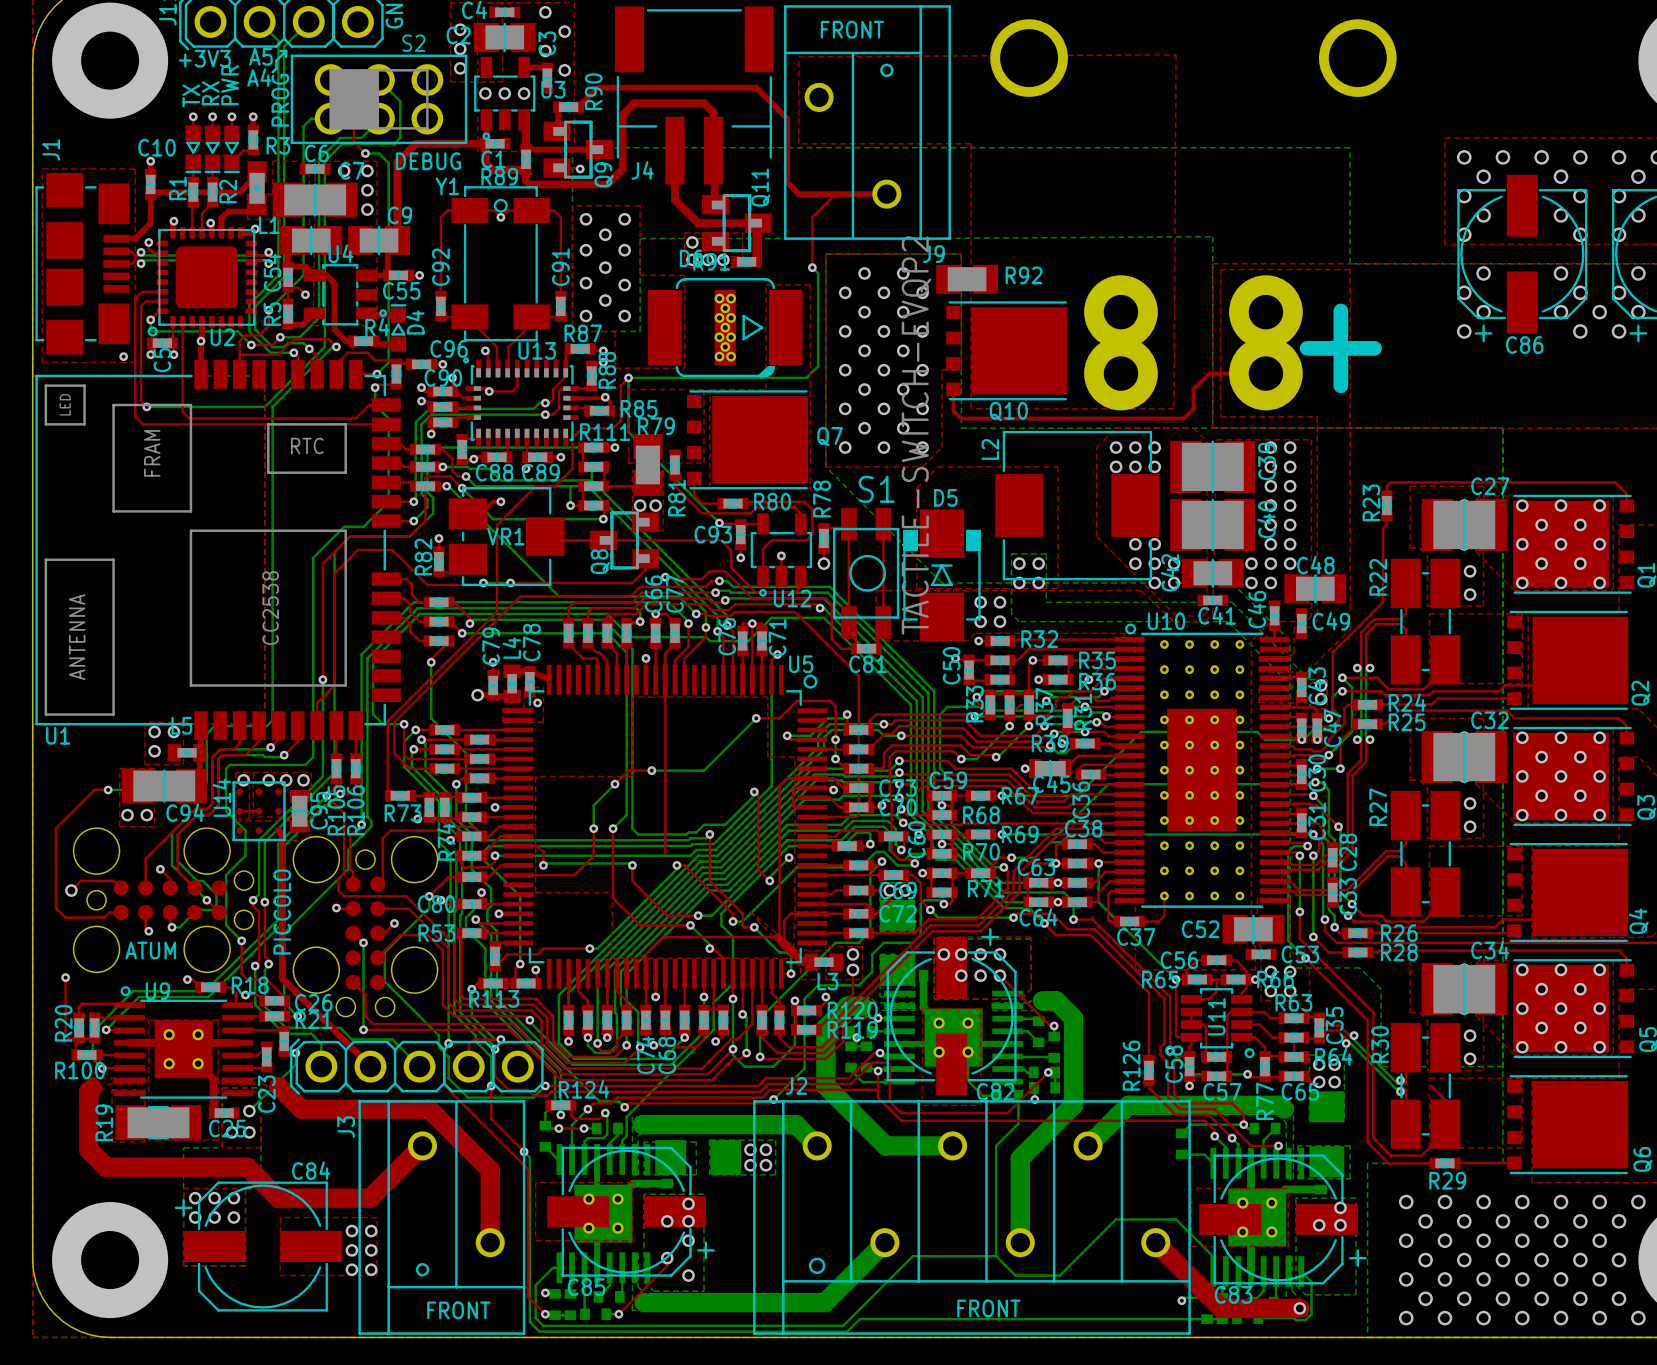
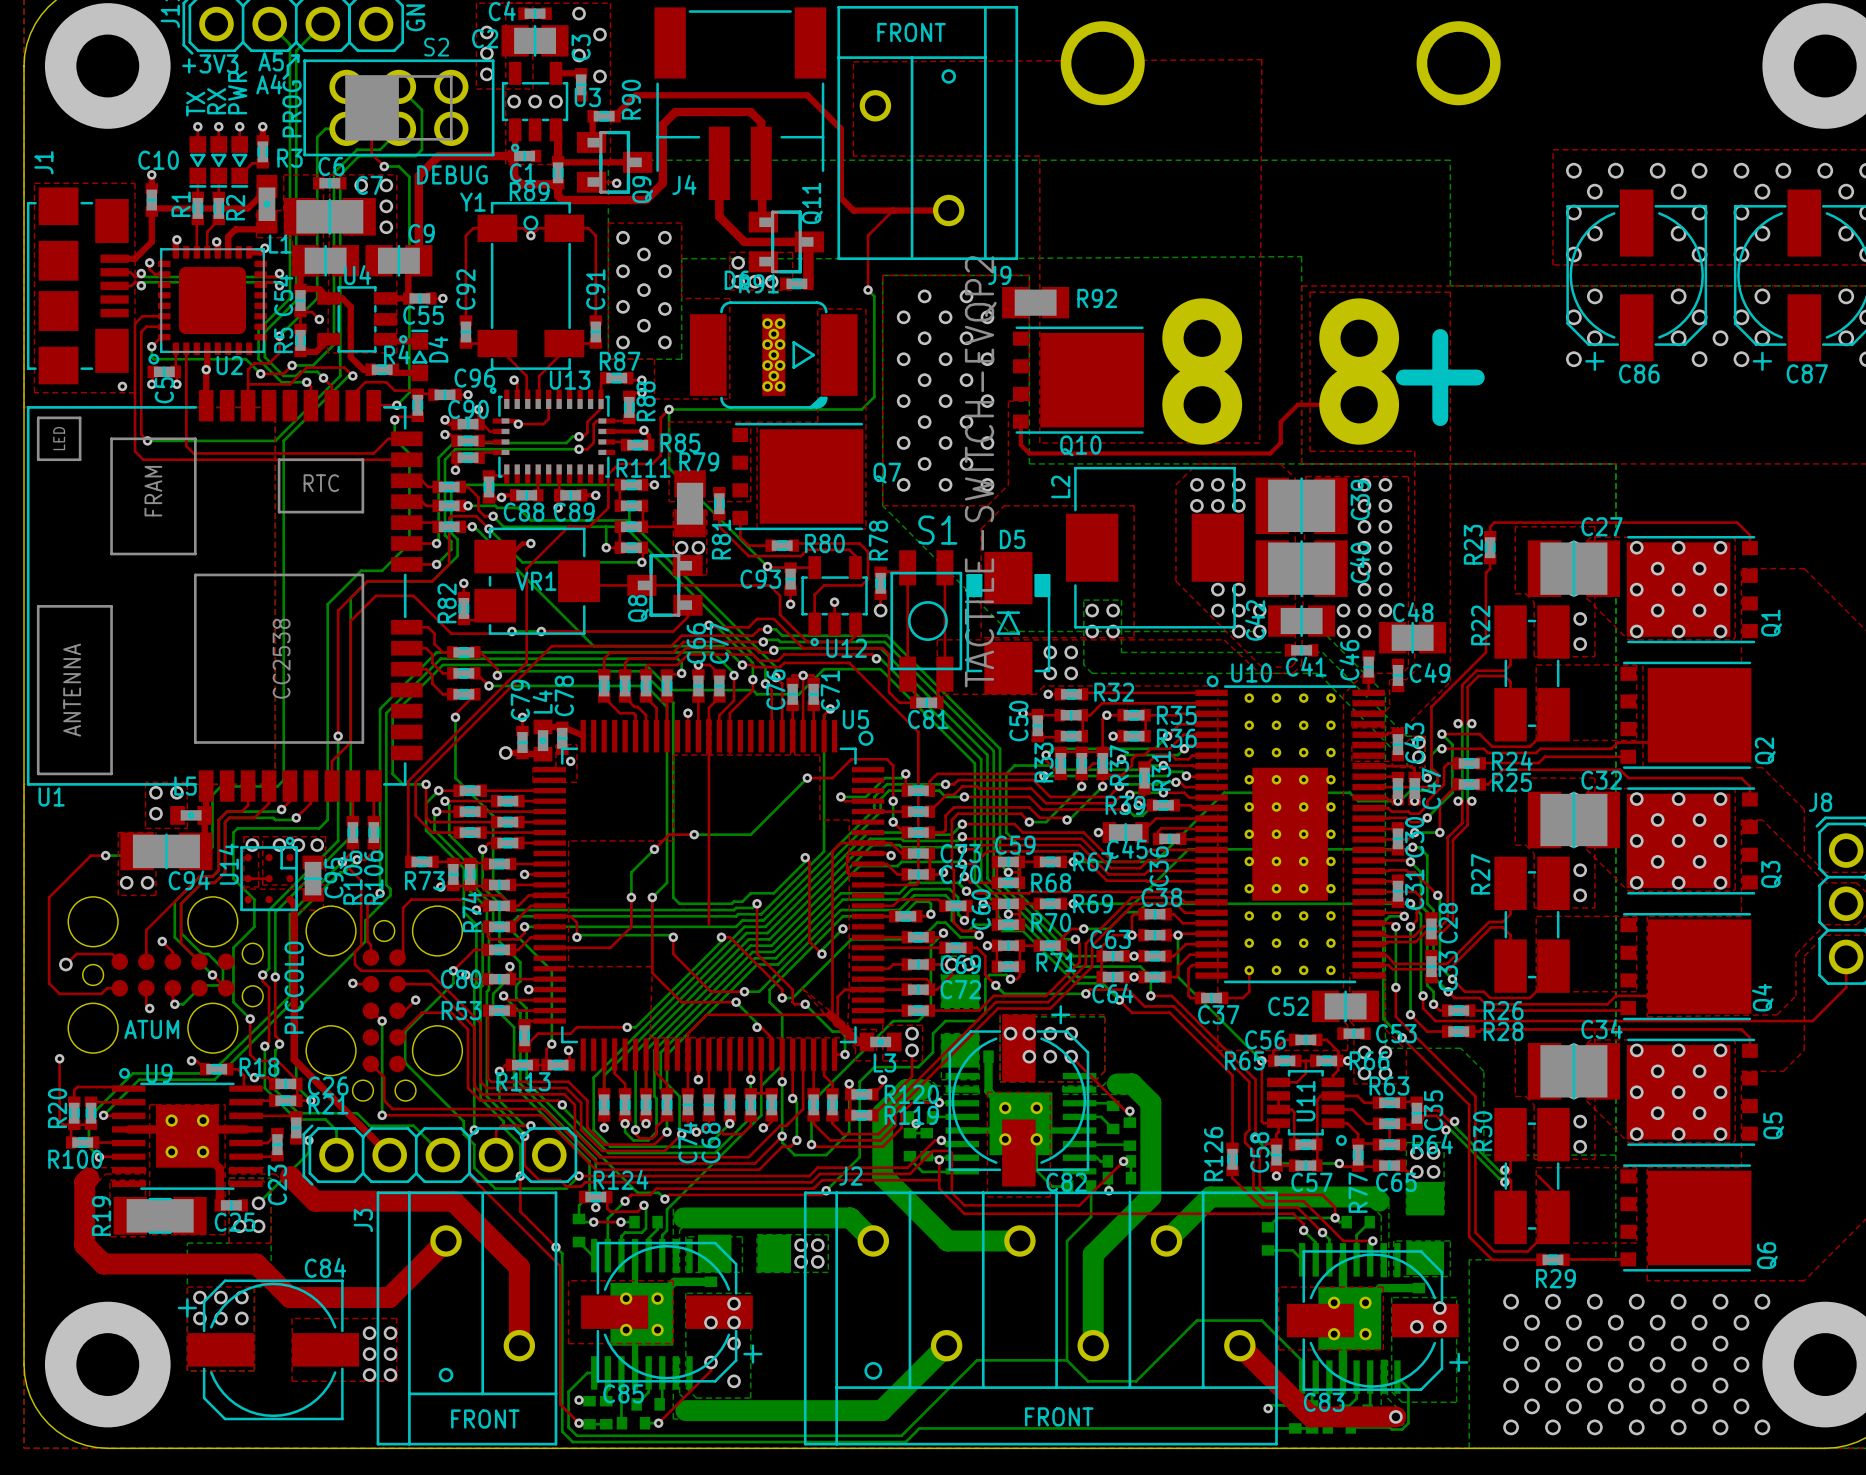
U14 footprint: [232, 781, 286, 842] -> [240, 836, 298, 912]

